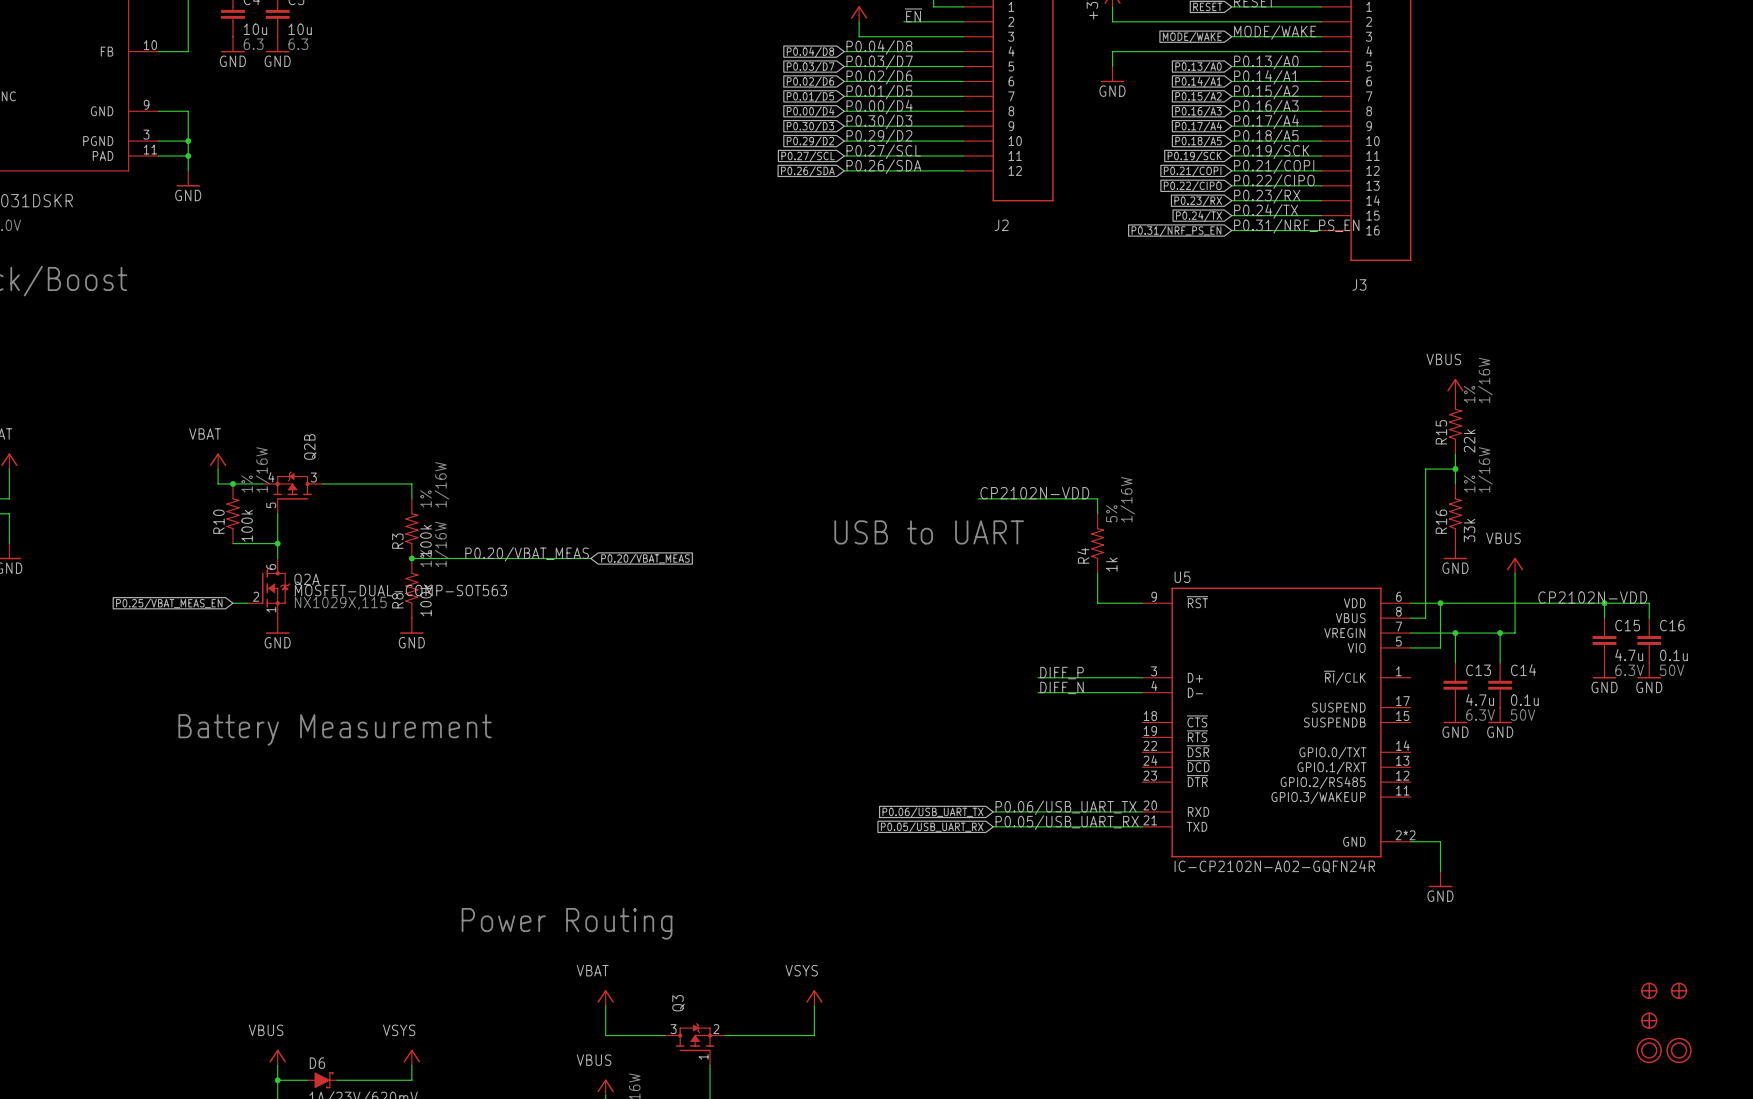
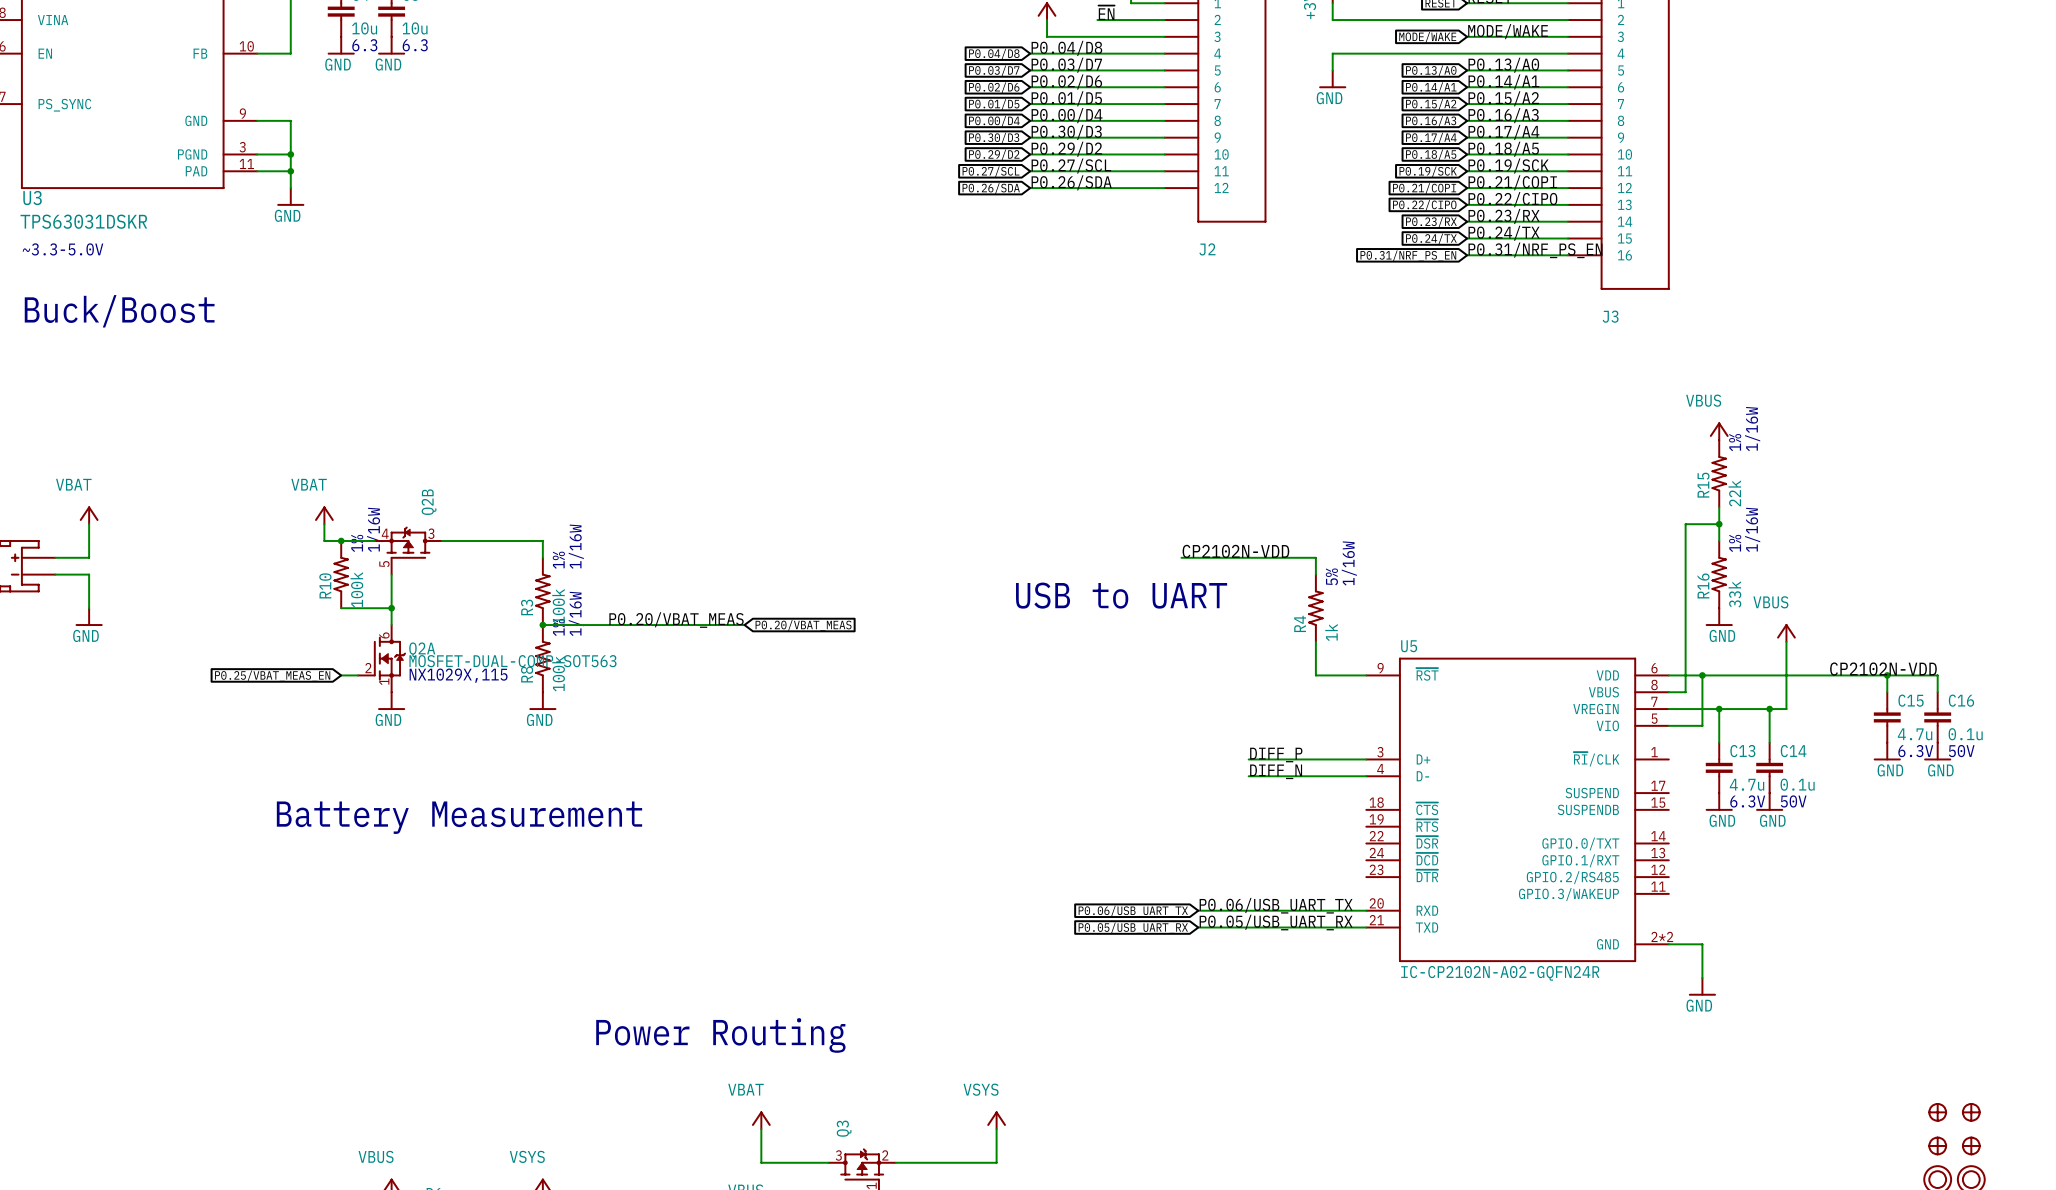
part: none -> (1971, 1145)

